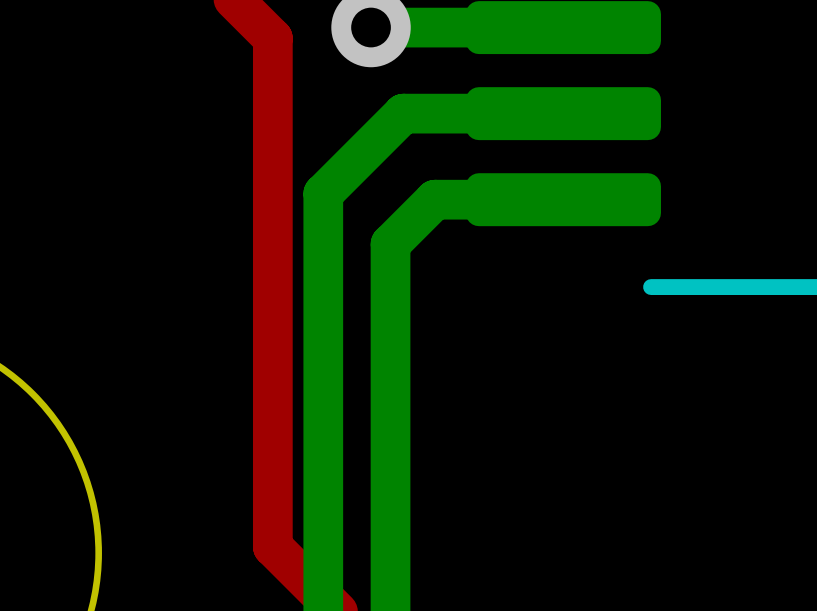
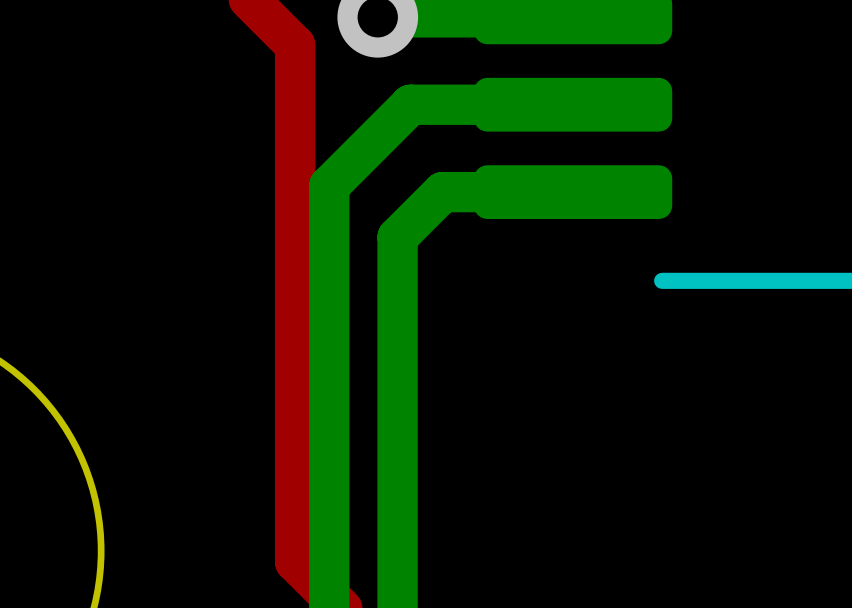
top track: (272, 38) (272, 546) (289, 563) -> (278, 28) (295, 45) (295, 561)

